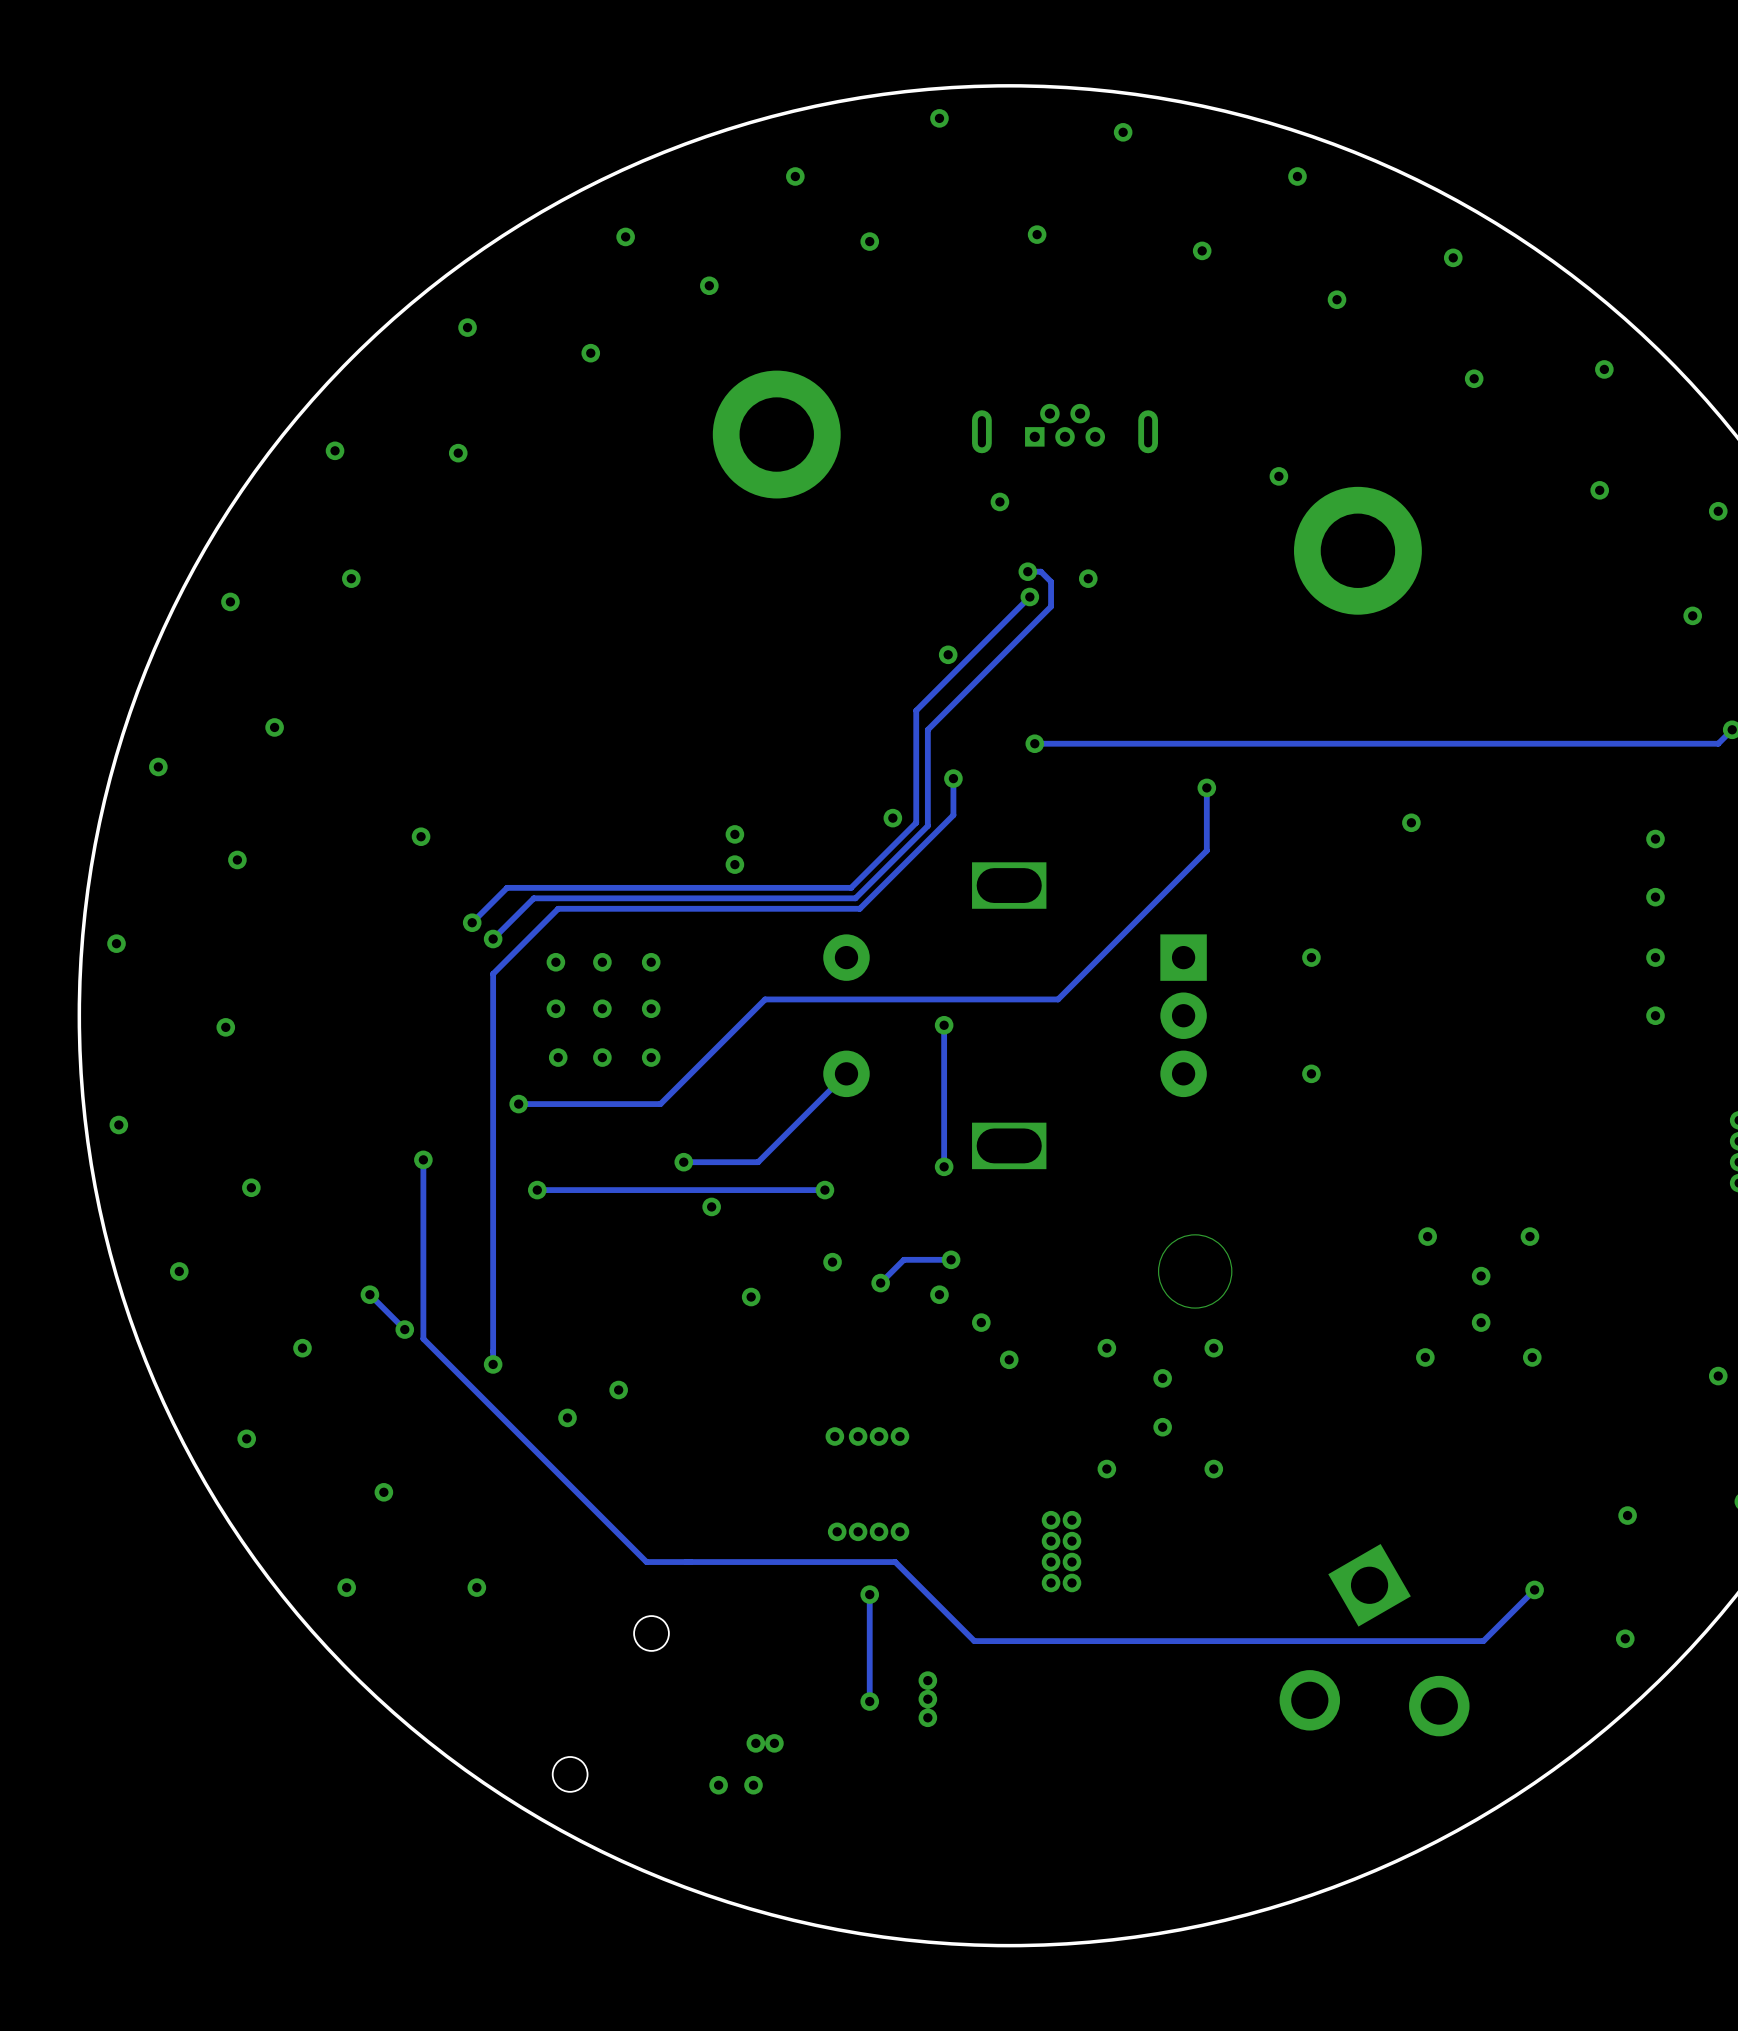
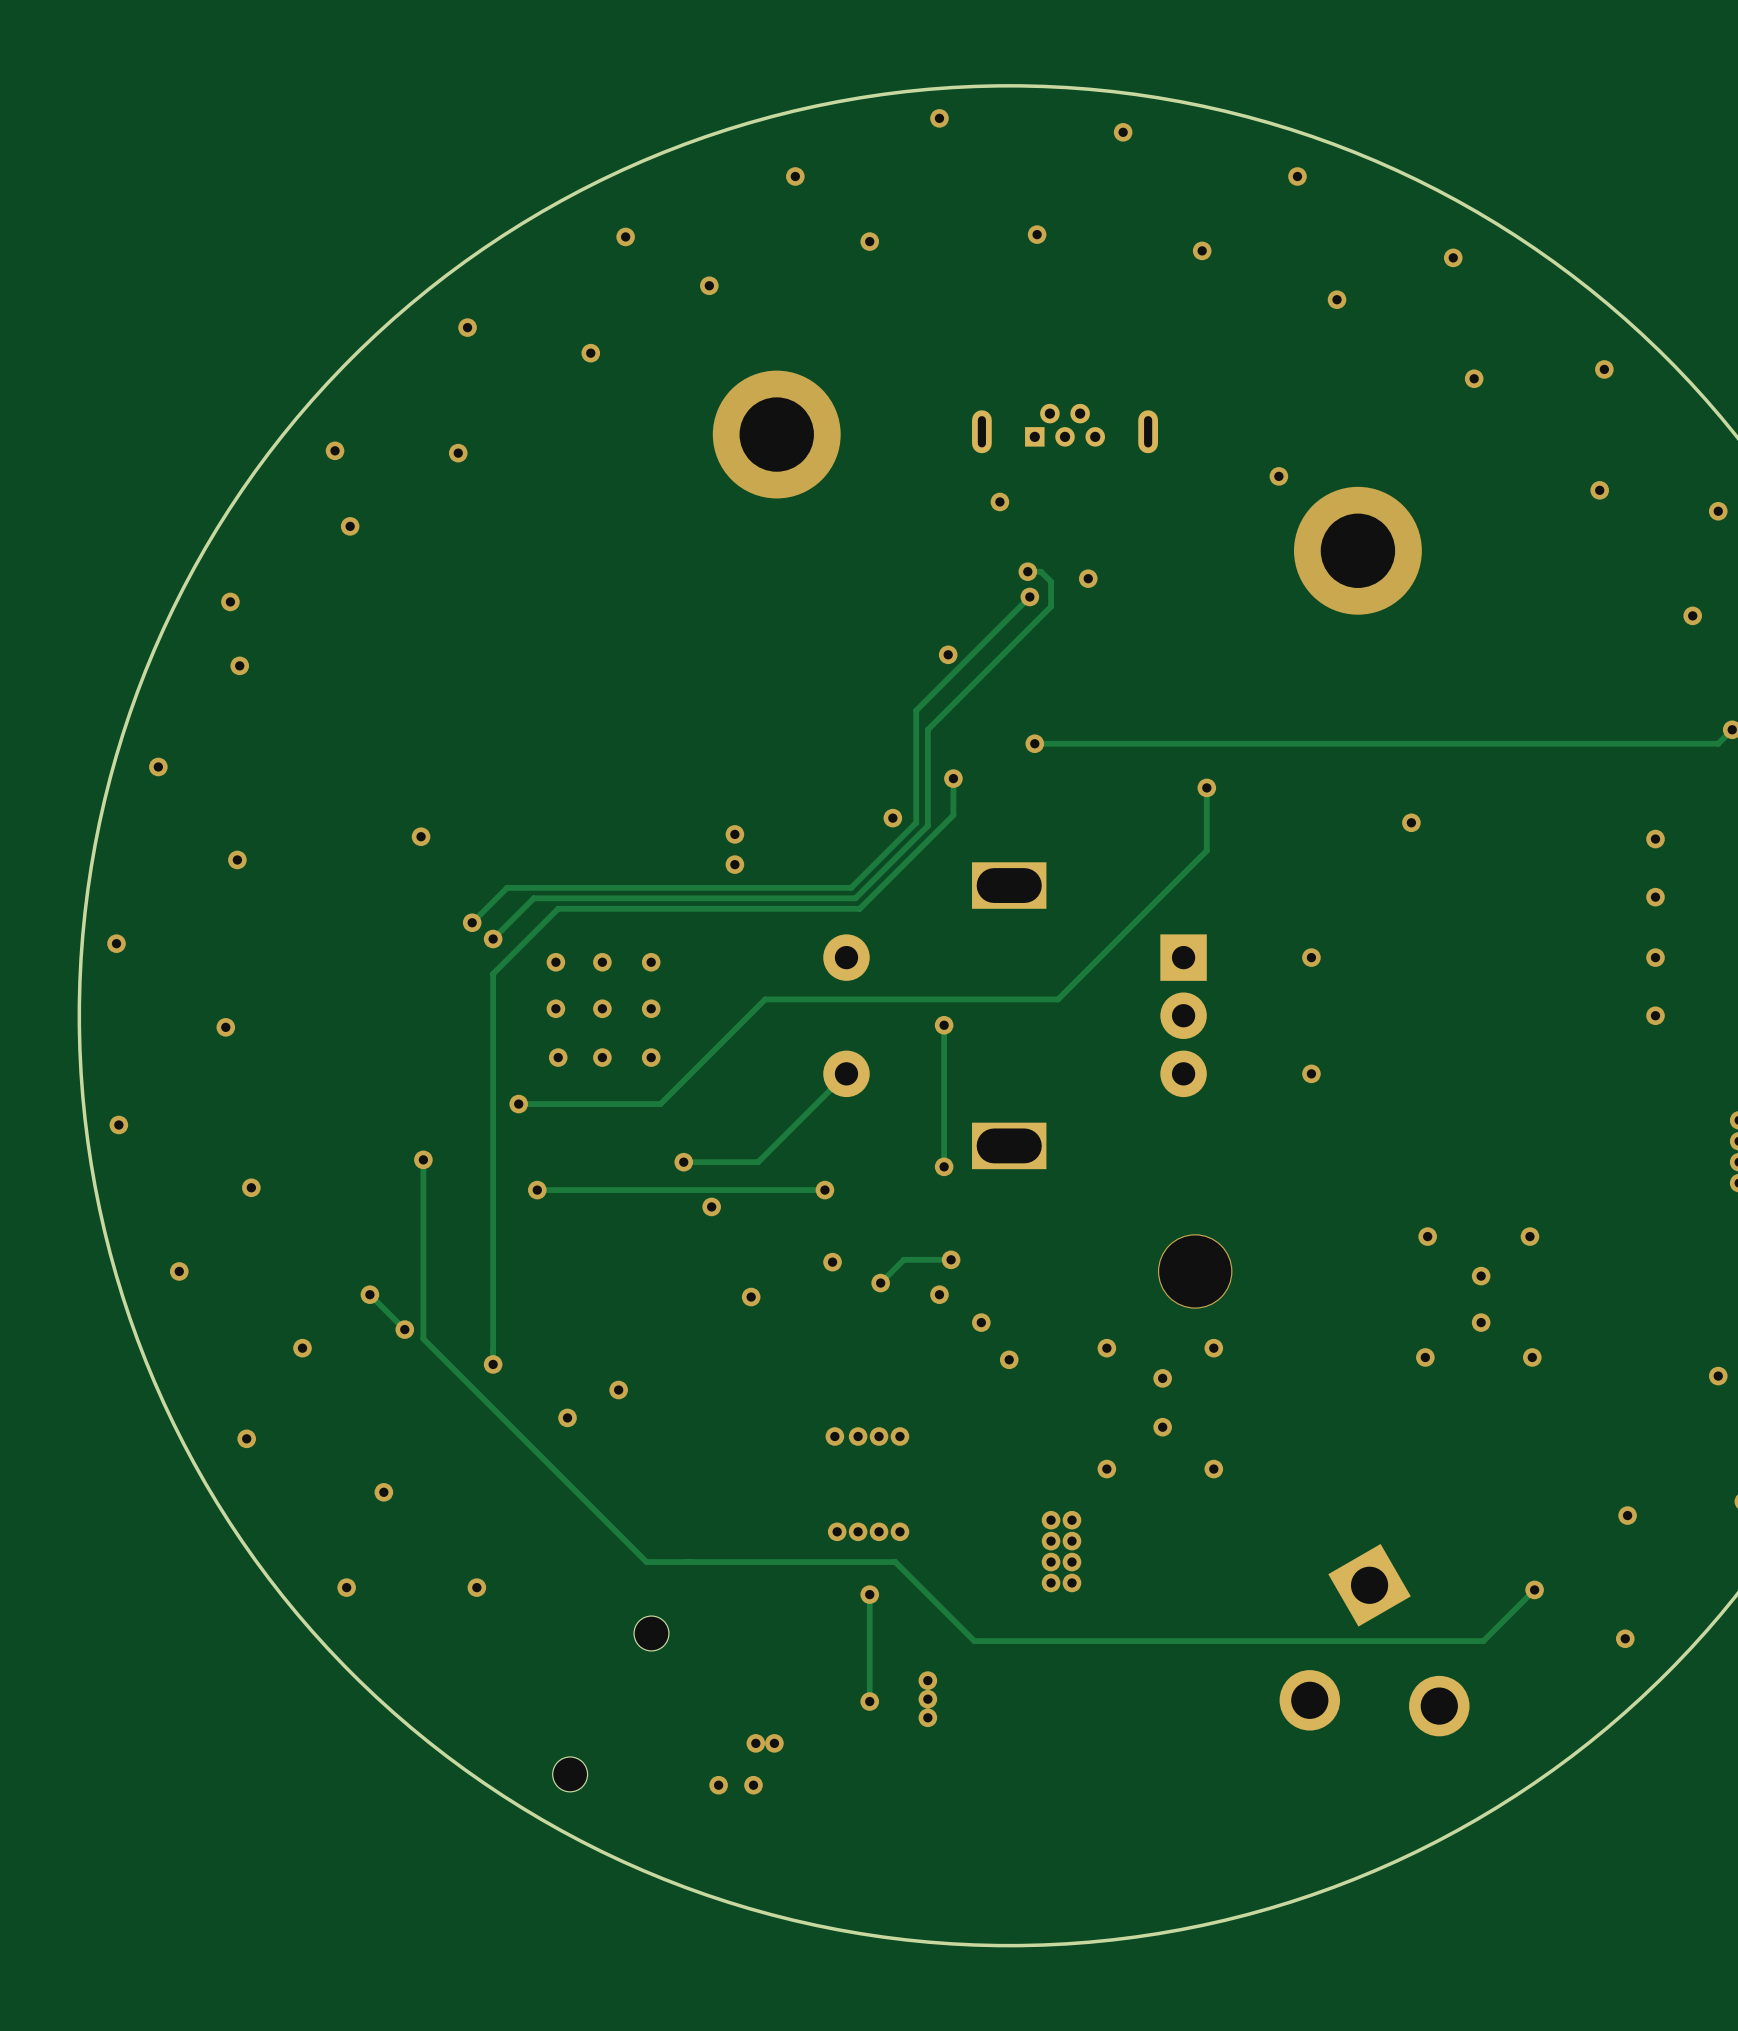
via position: (351, 578) -> (350, 526)
via: none -> (239, 665)
via: (274, 727) -> none

